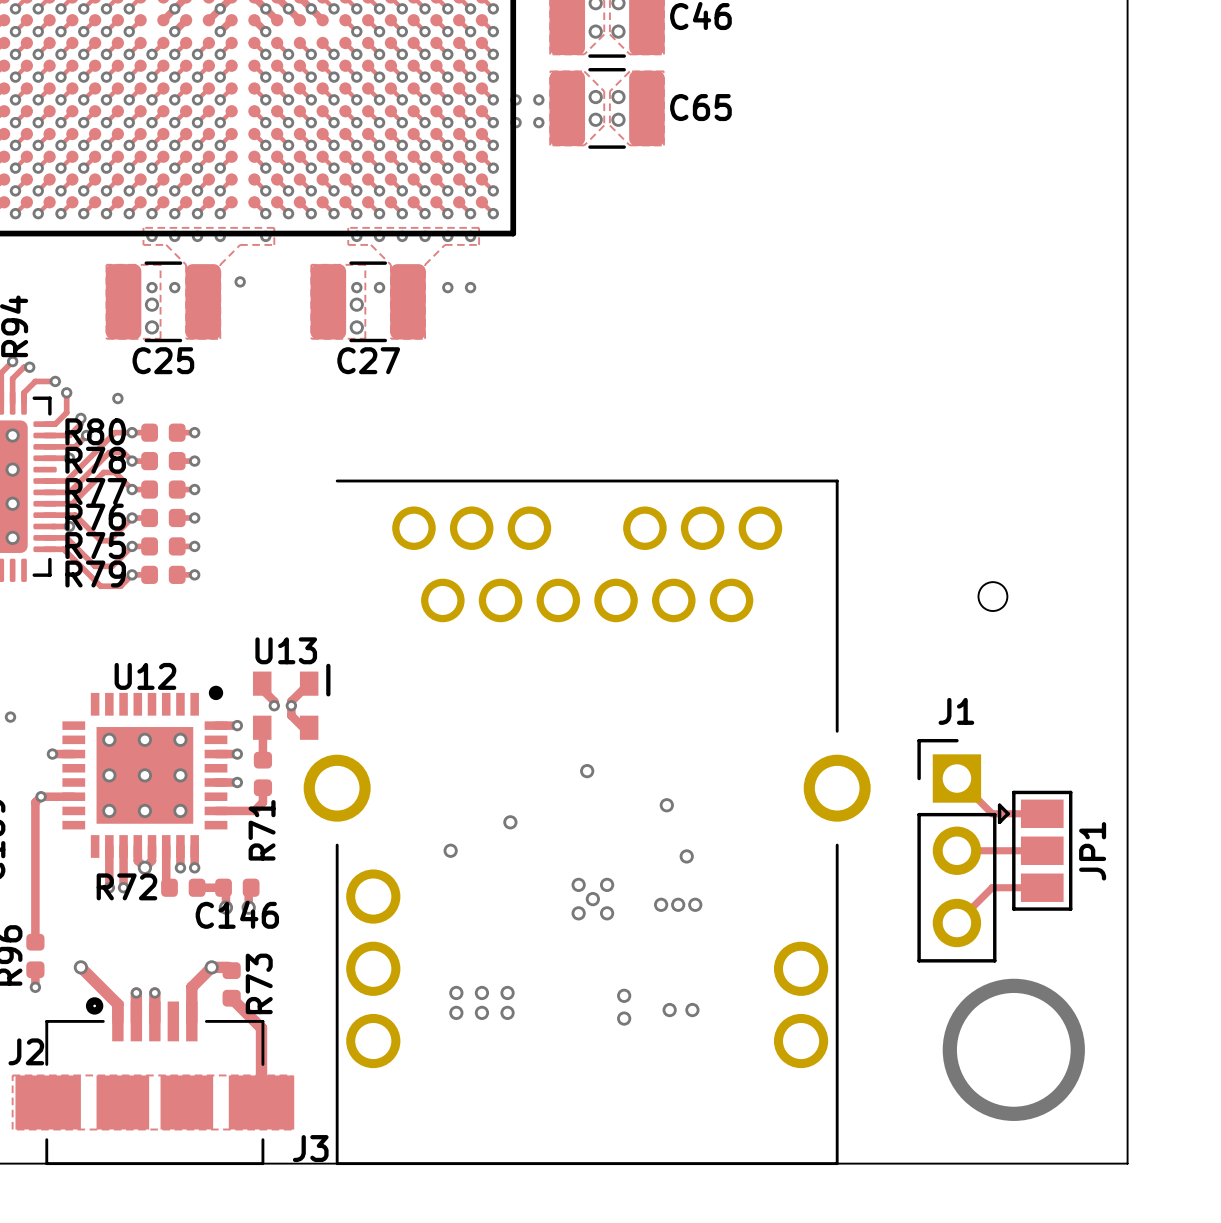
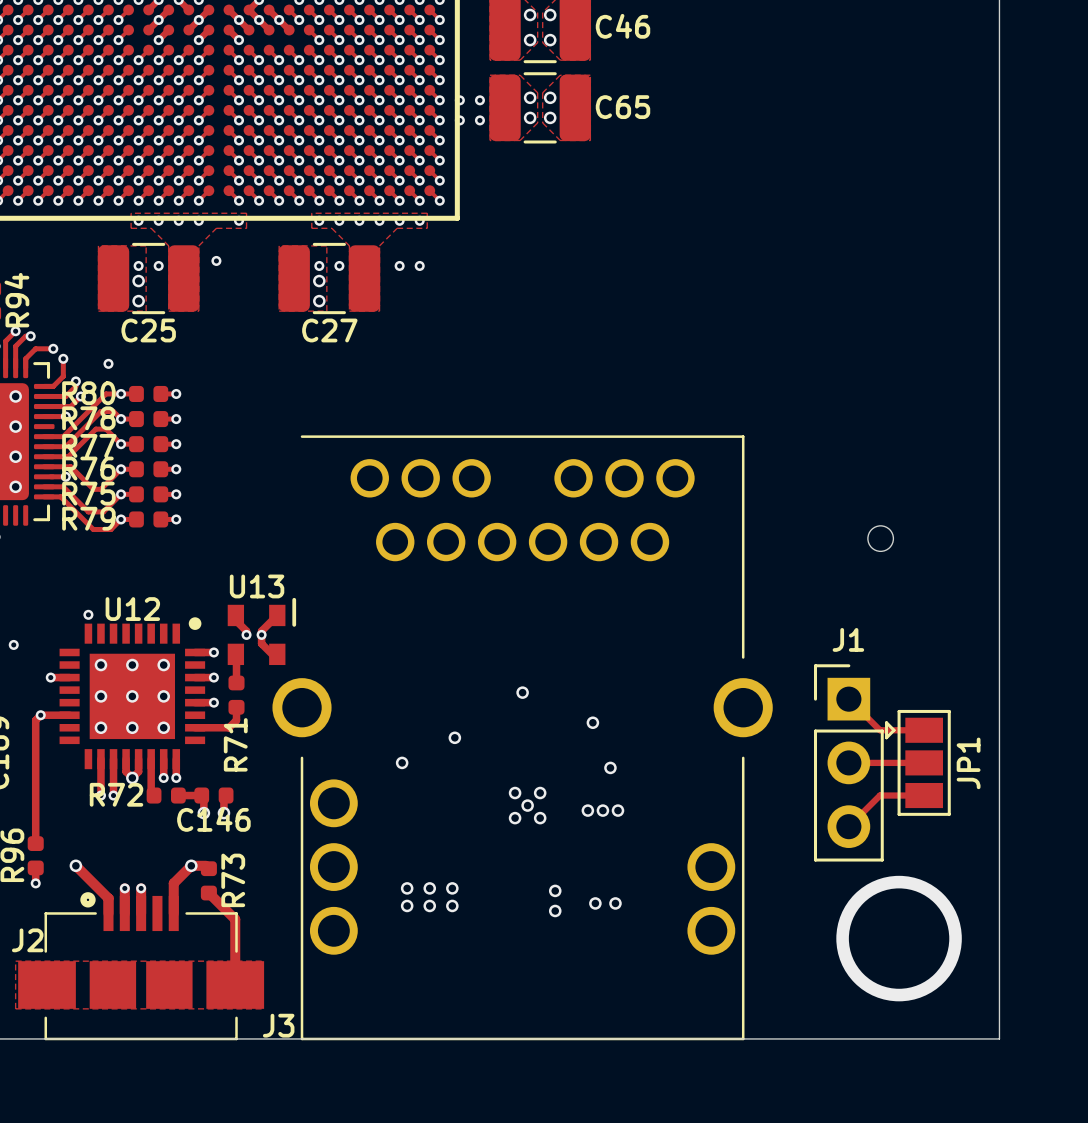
via: none -> (88, 614)

